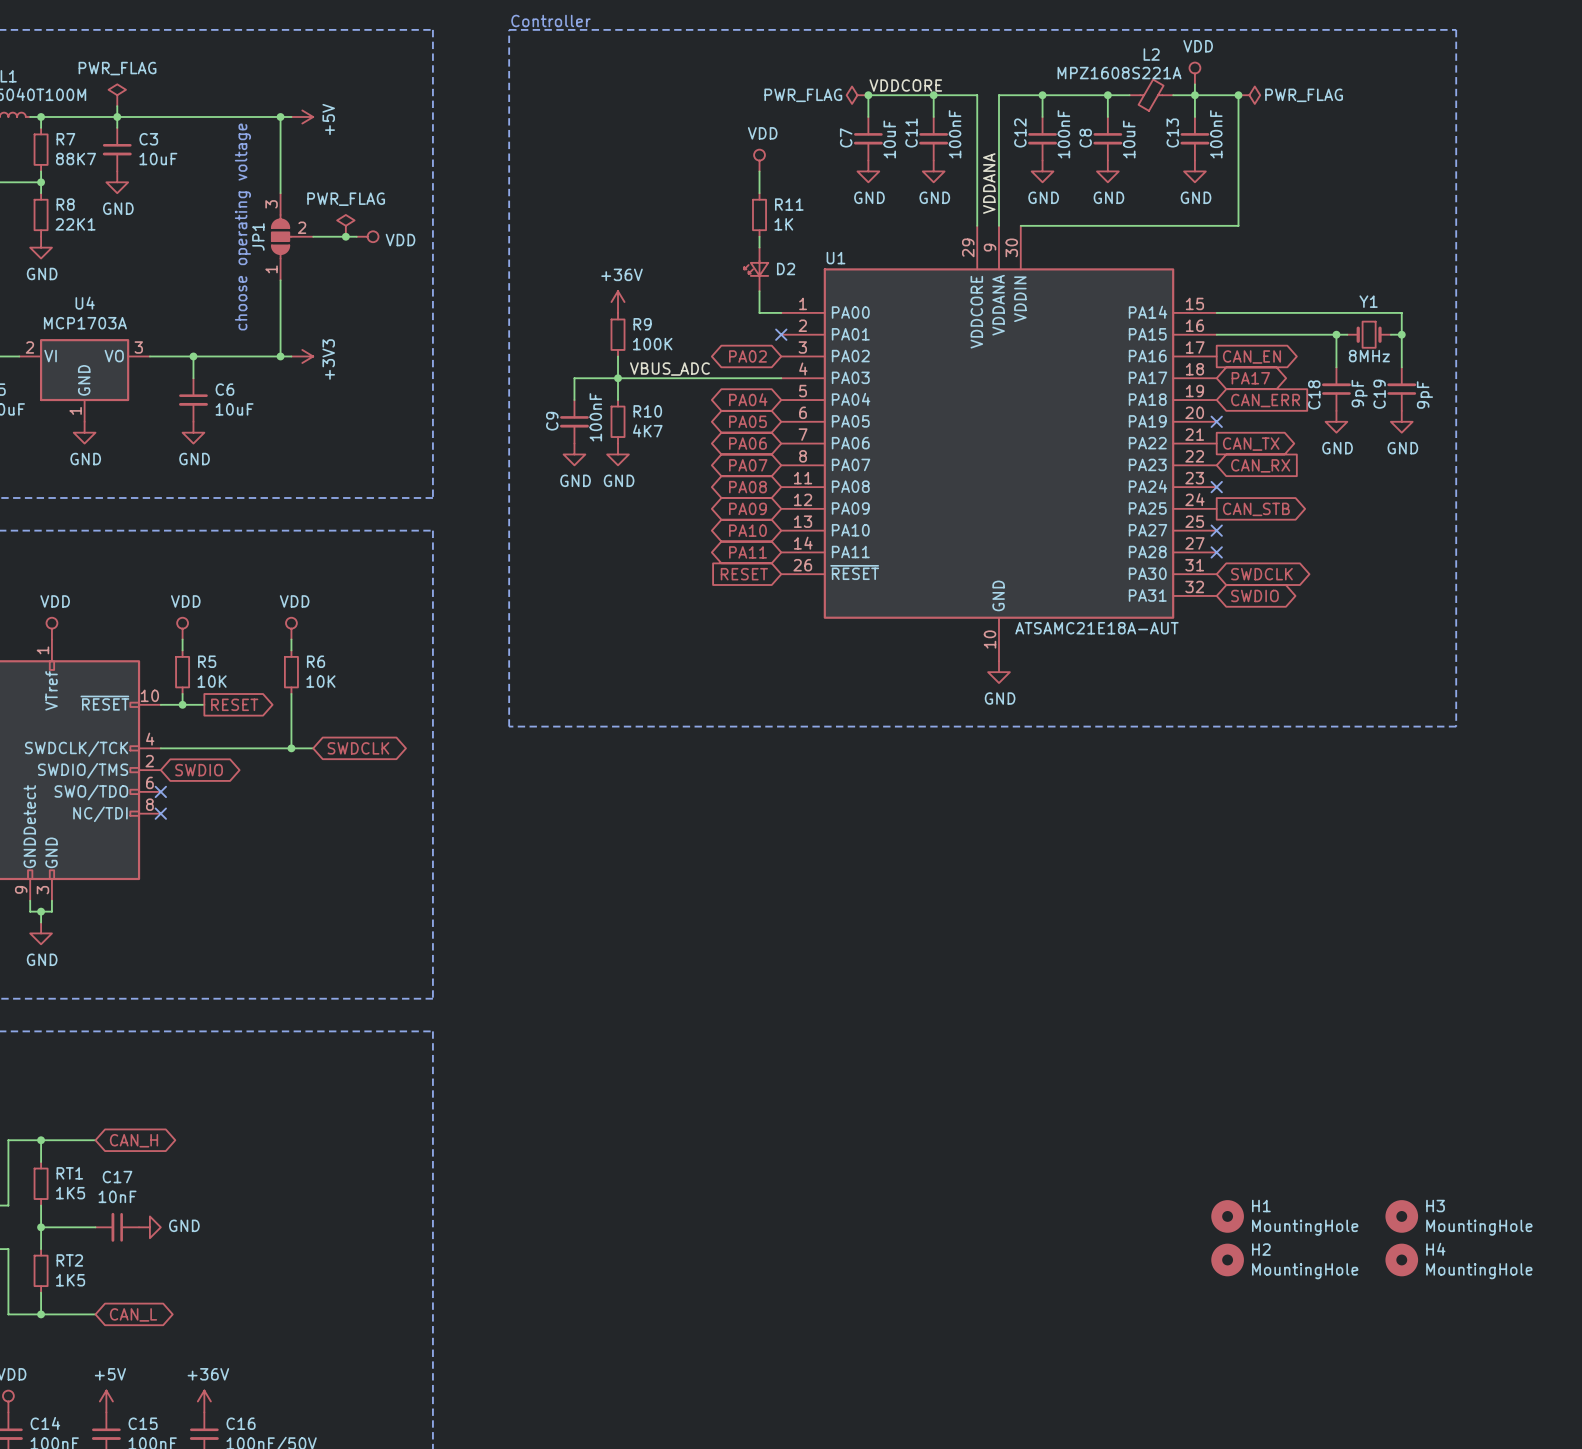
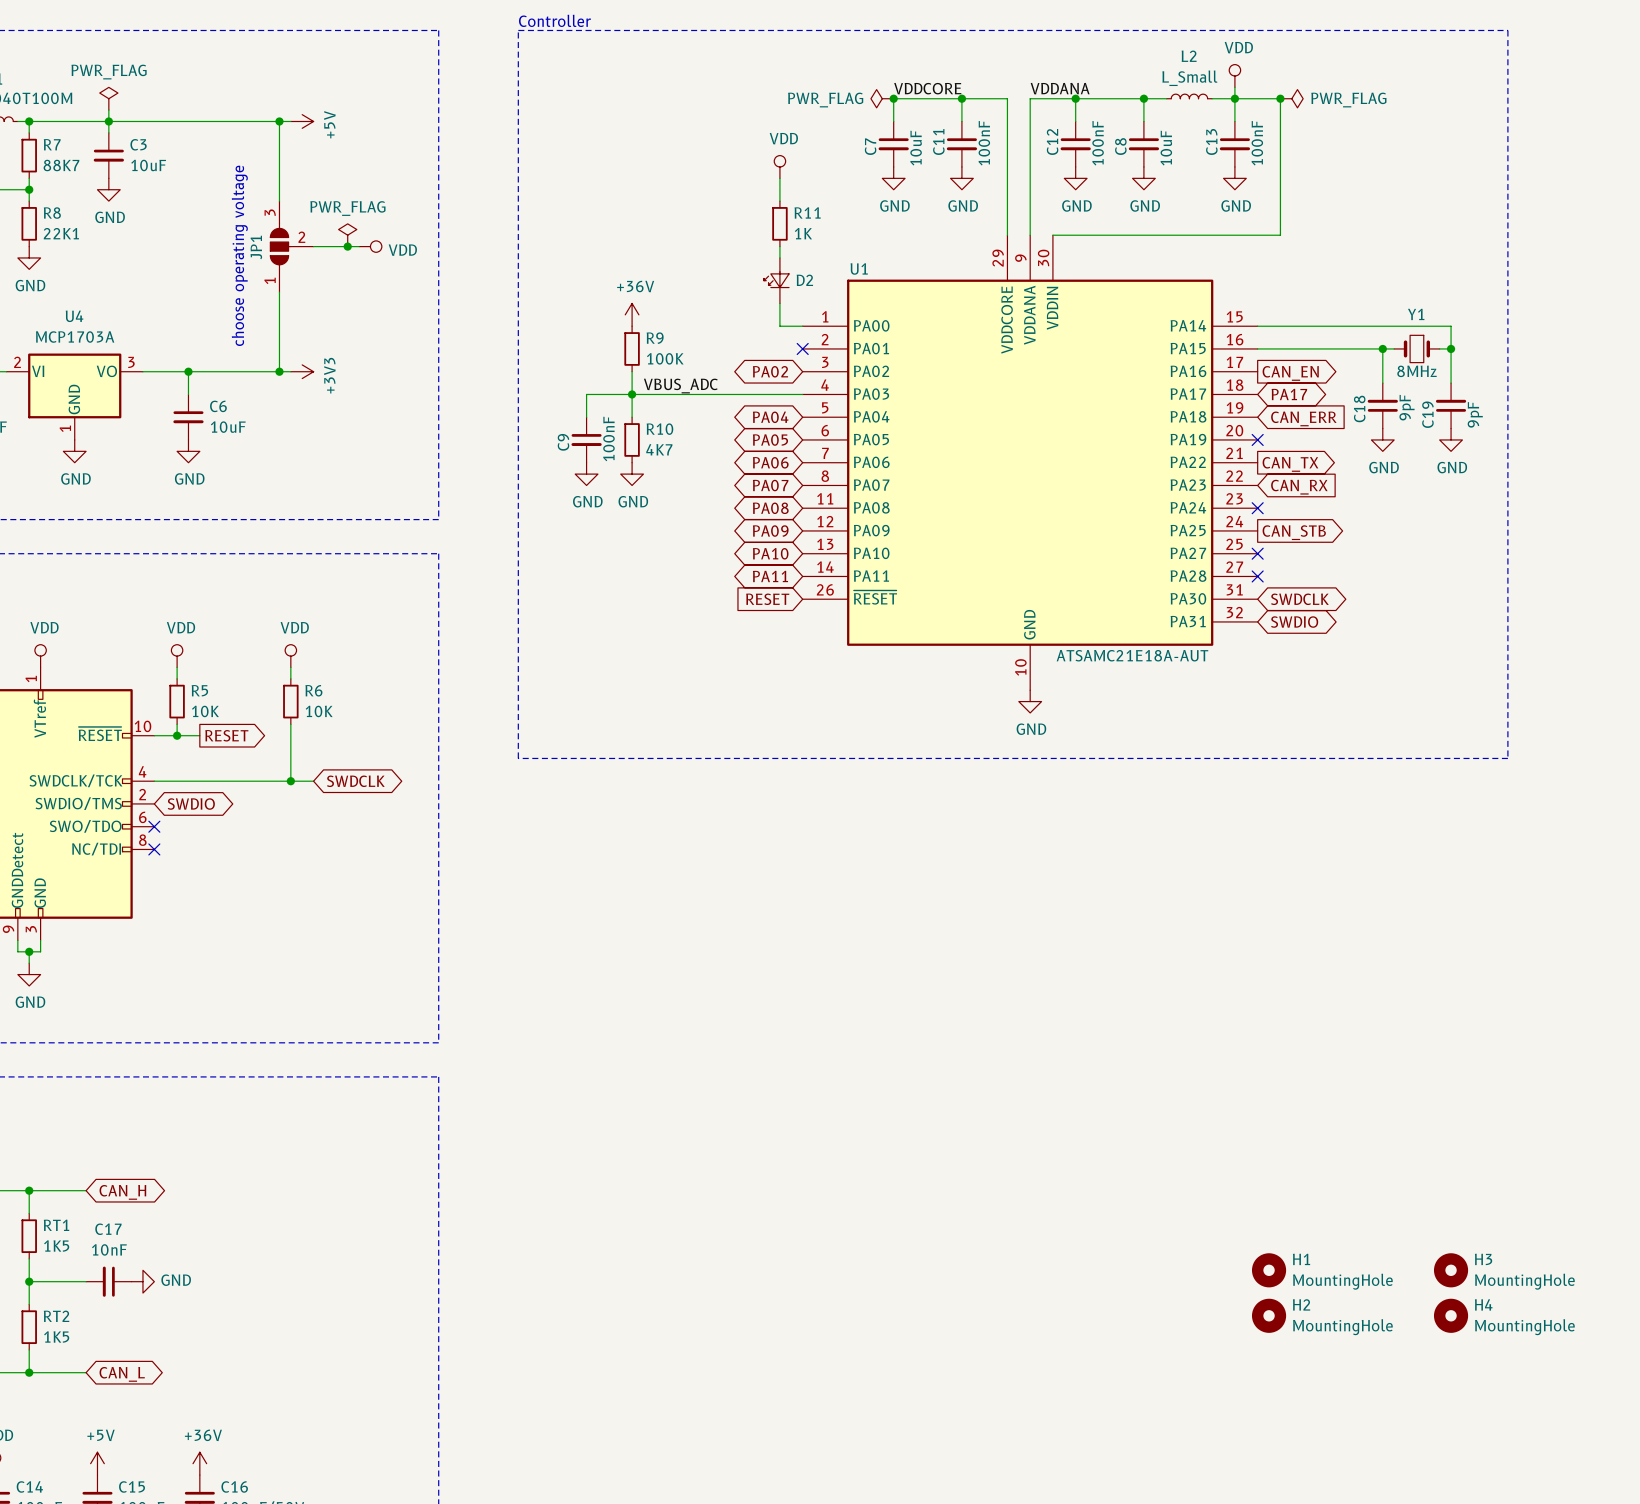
L2 value: MPZ1608S221A (1119, 73) -> L_Small (1189, 78)
L2 symbol: [1129, 79, 1174, 111] -> [1166, 94, 1213, 99]
label rotation: 0° (989, 183) -> 90° clockwise (1060, 88)
label position: VDDANA (989, 183) -> VDDANA (1060, 88)

